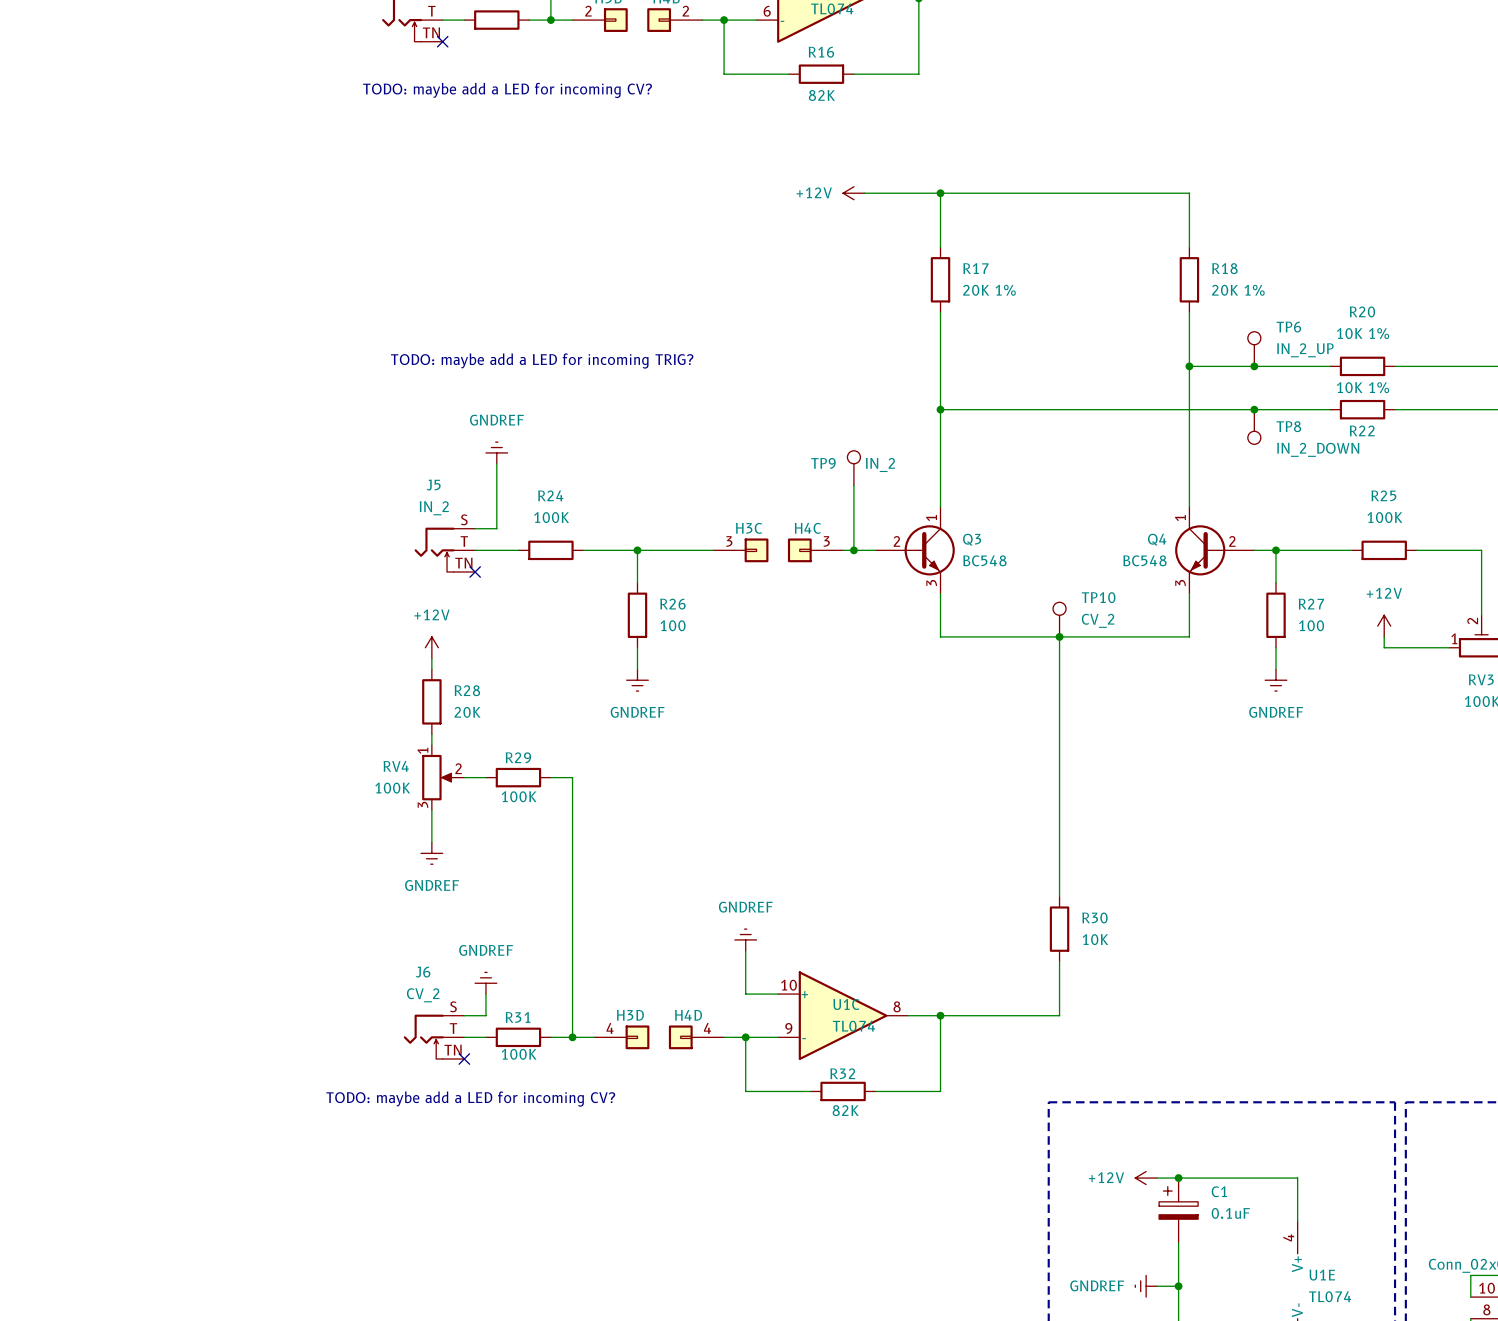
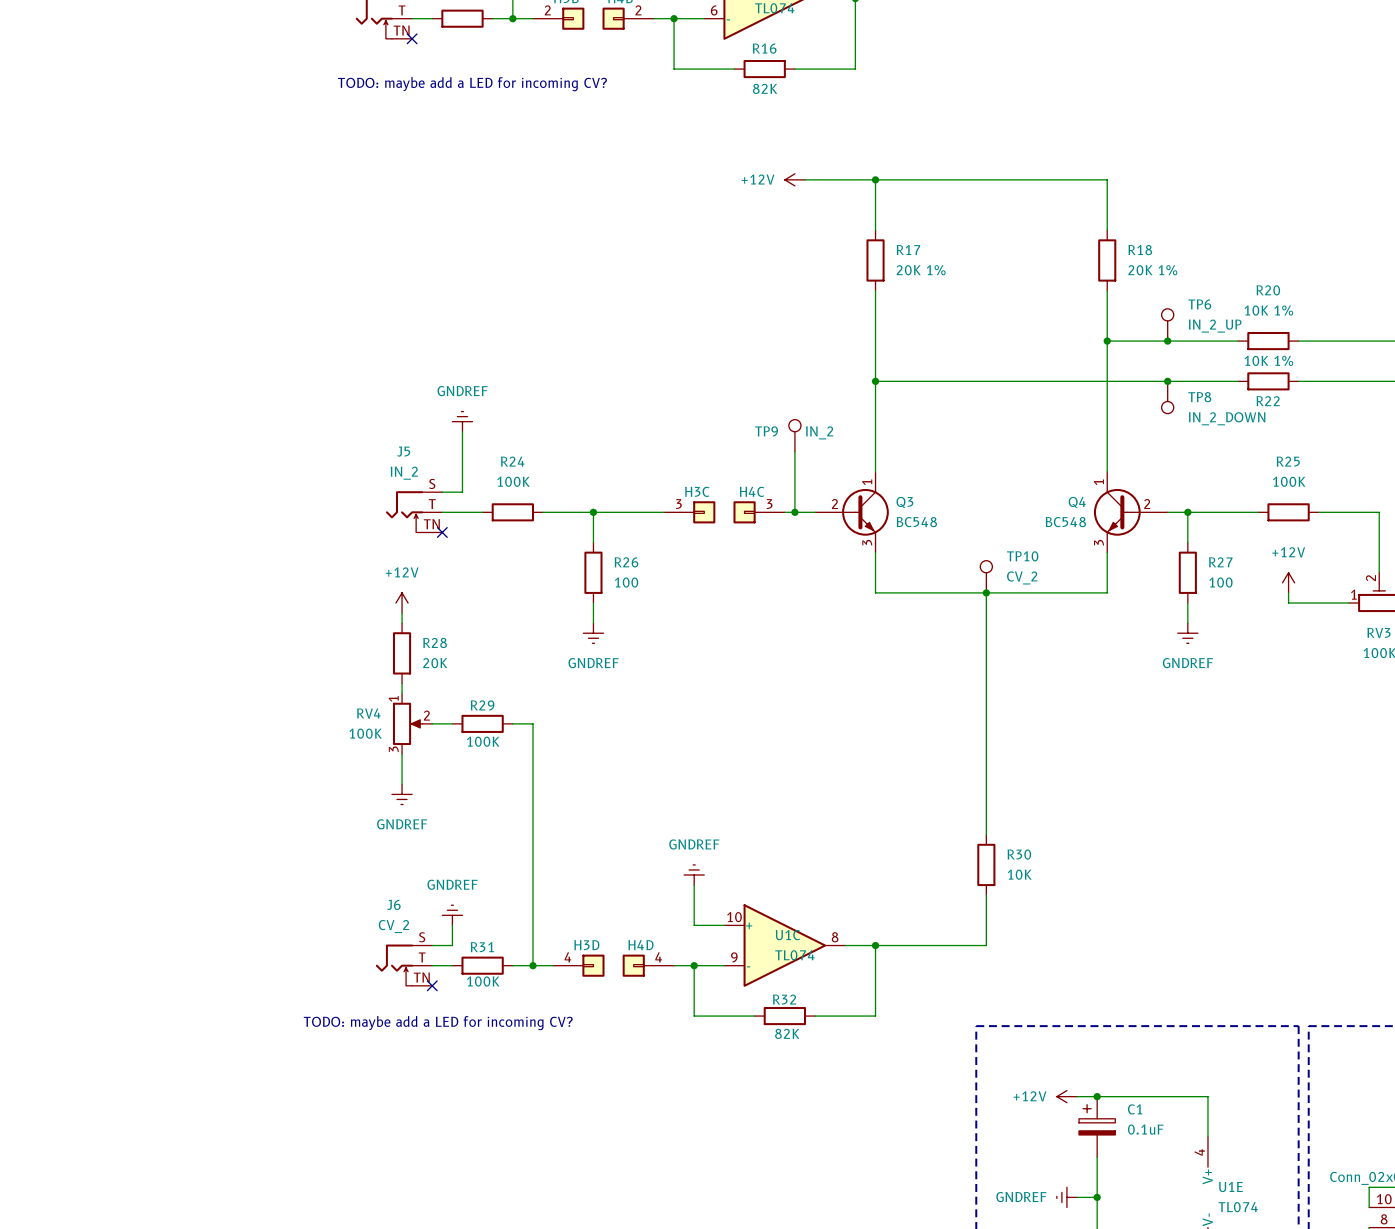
text: TODO: maybe add a LED for incoming TRIG? (542, 361) -> none

